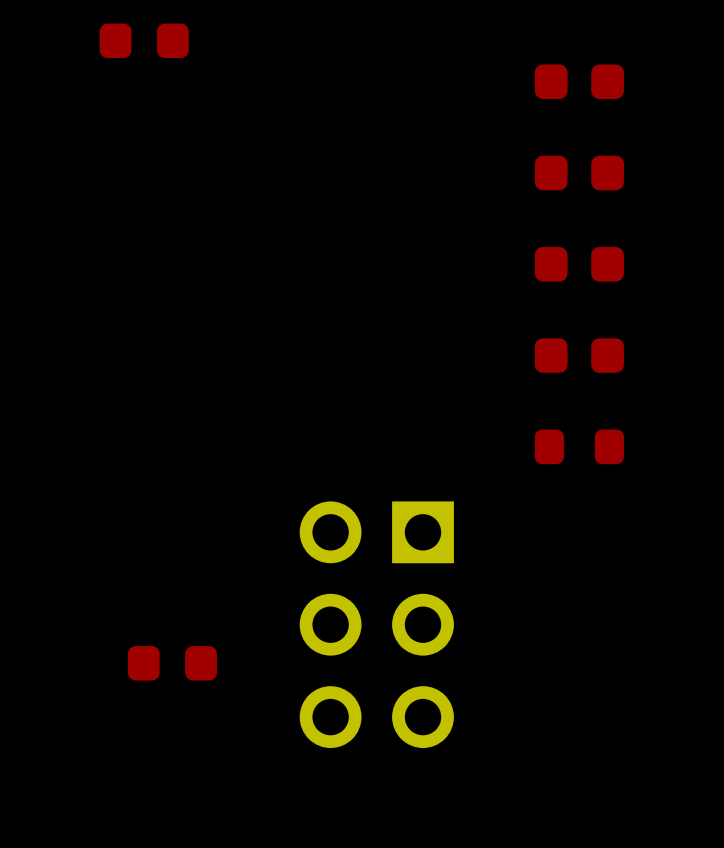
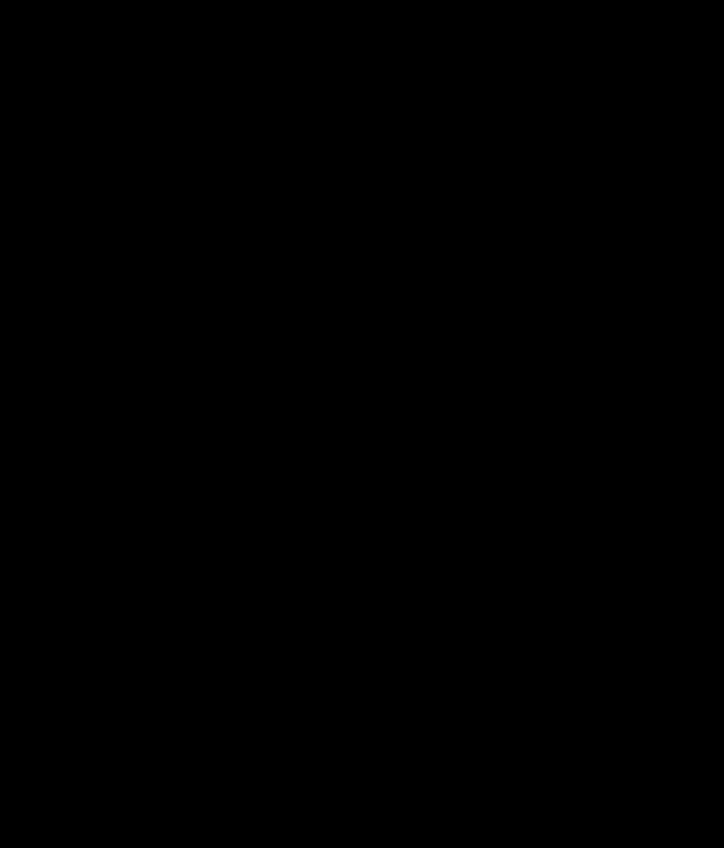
part: (144, 40) -> none
part: (579, 81) -> none
part: (579, 173) -> none
part: (579, 264) -> none
part: (579, 355) -> none
part: (579, 446) -> none
part: (376, 624) -> none
part: (172, 663) -> none

